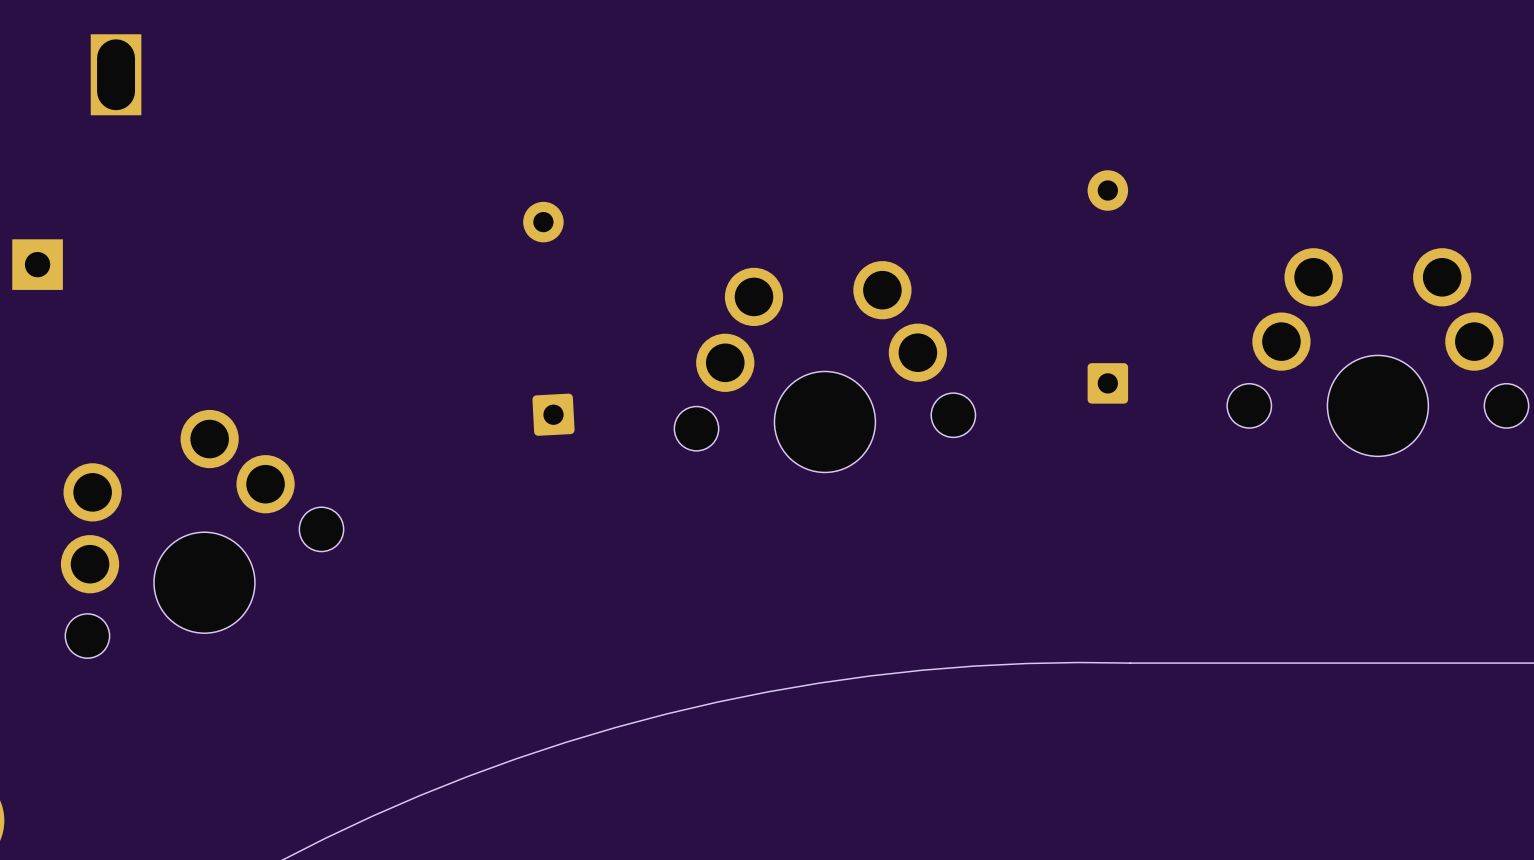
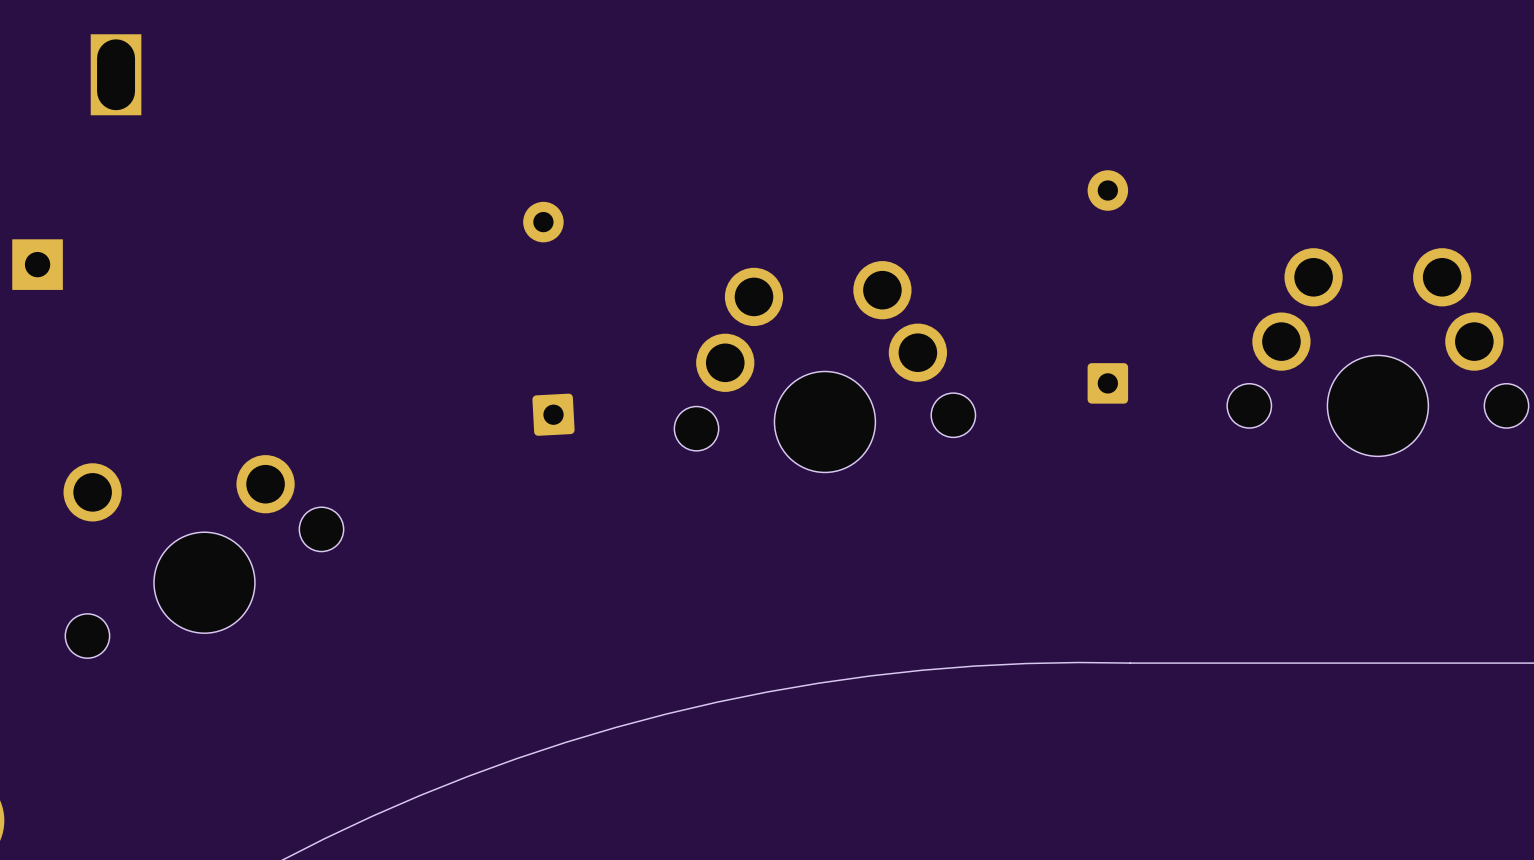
part footprint: [60, 409, 344, 659] -> [63, 455, 344, 659]

